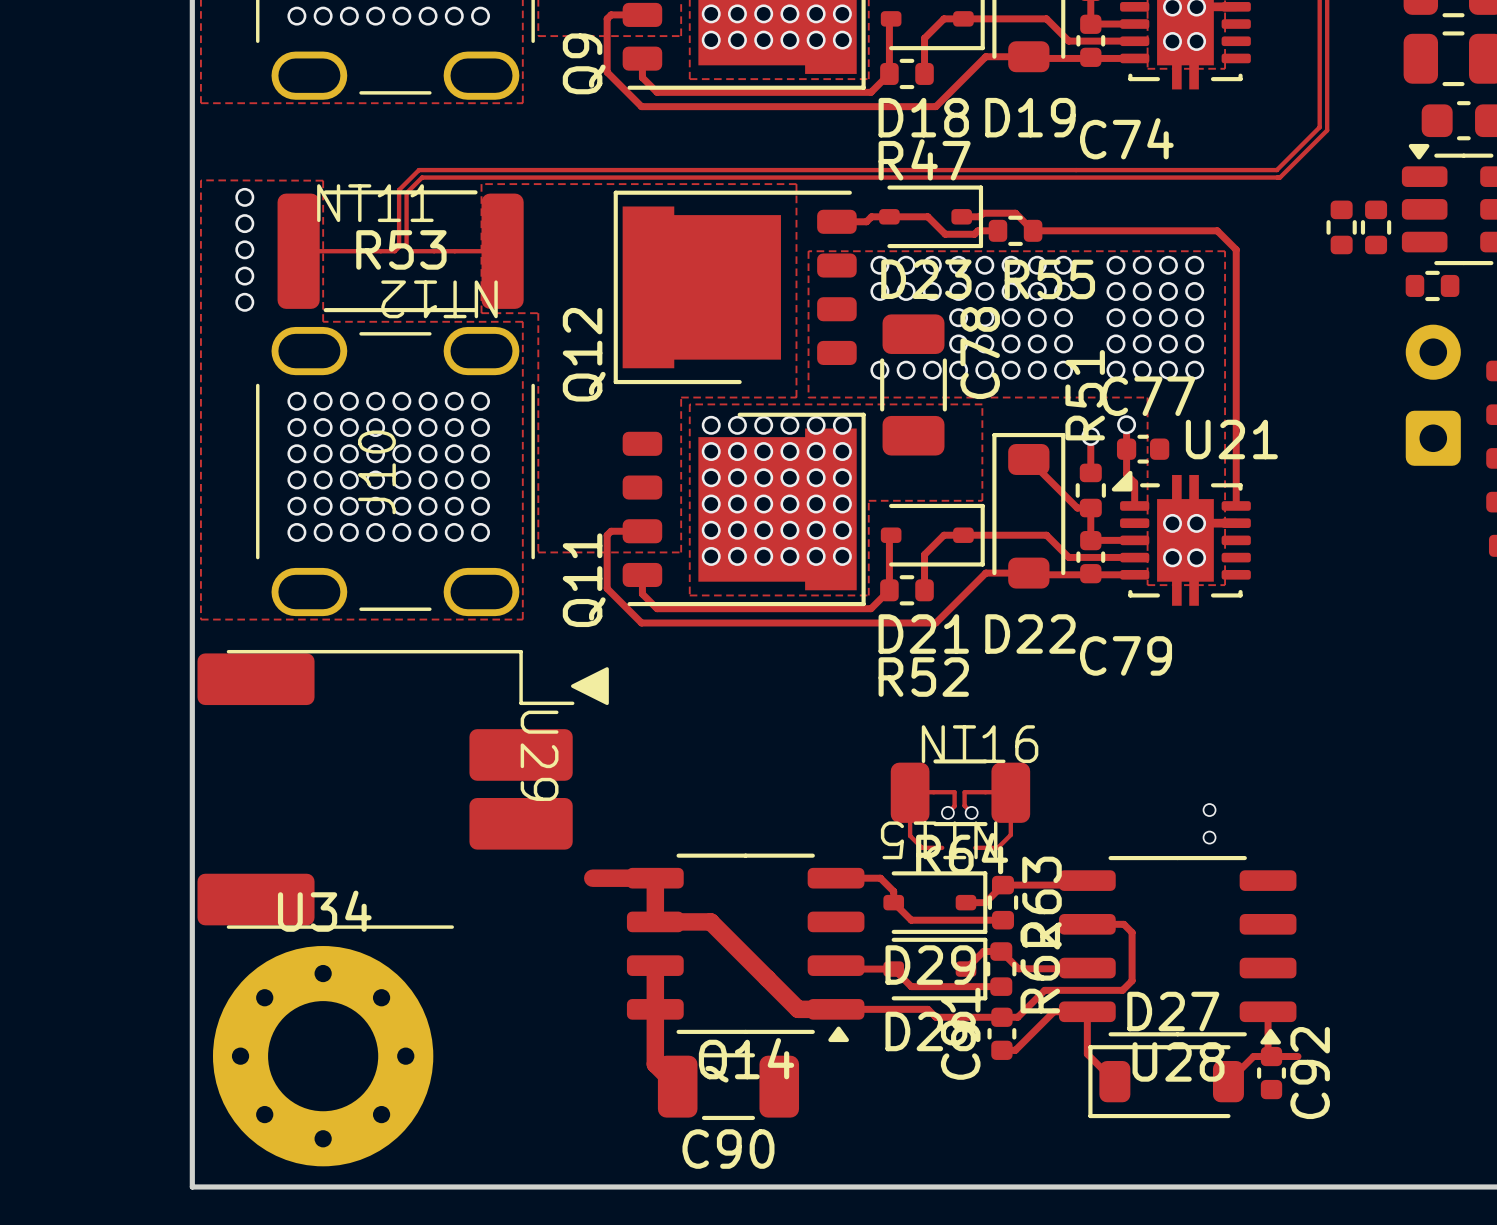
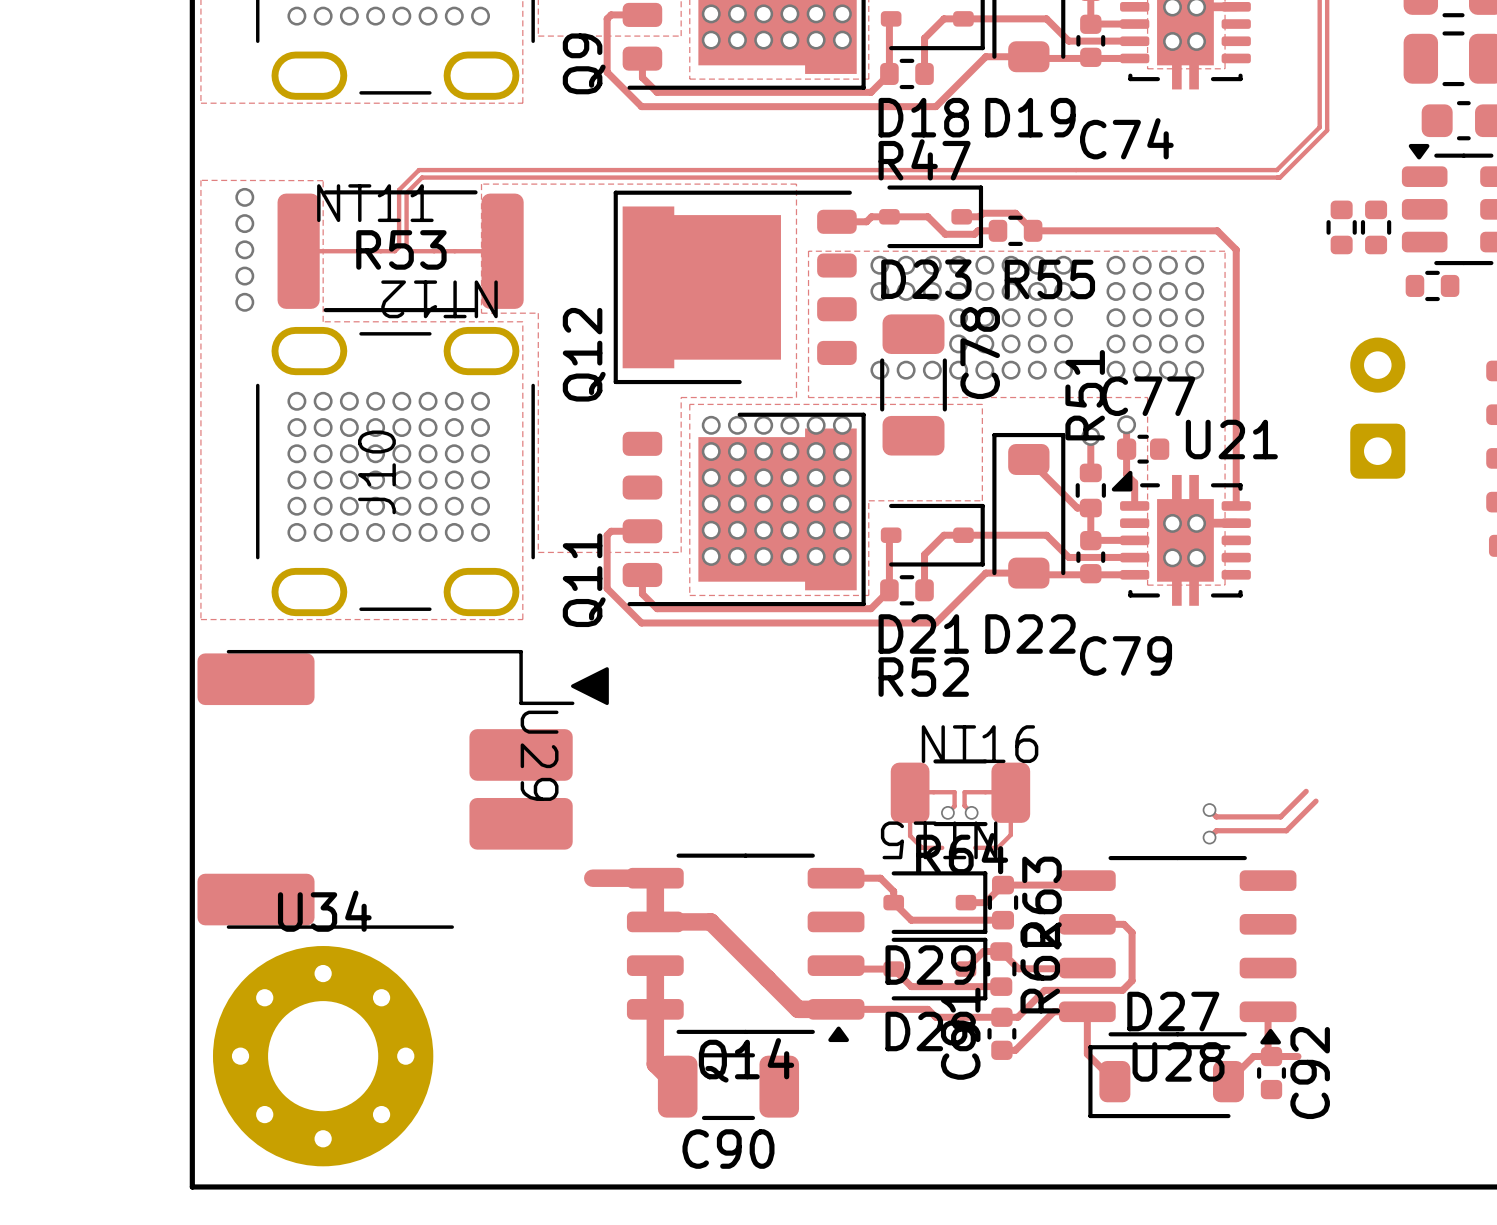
part position: (1433, 395) -> (1377, 408)
track: none -> (1306, 791) (1280, 816) (1216, 816) (1209, 810)
track: none -> (1315, 801) (1286, 830) (1216, 830) (1209, 837)

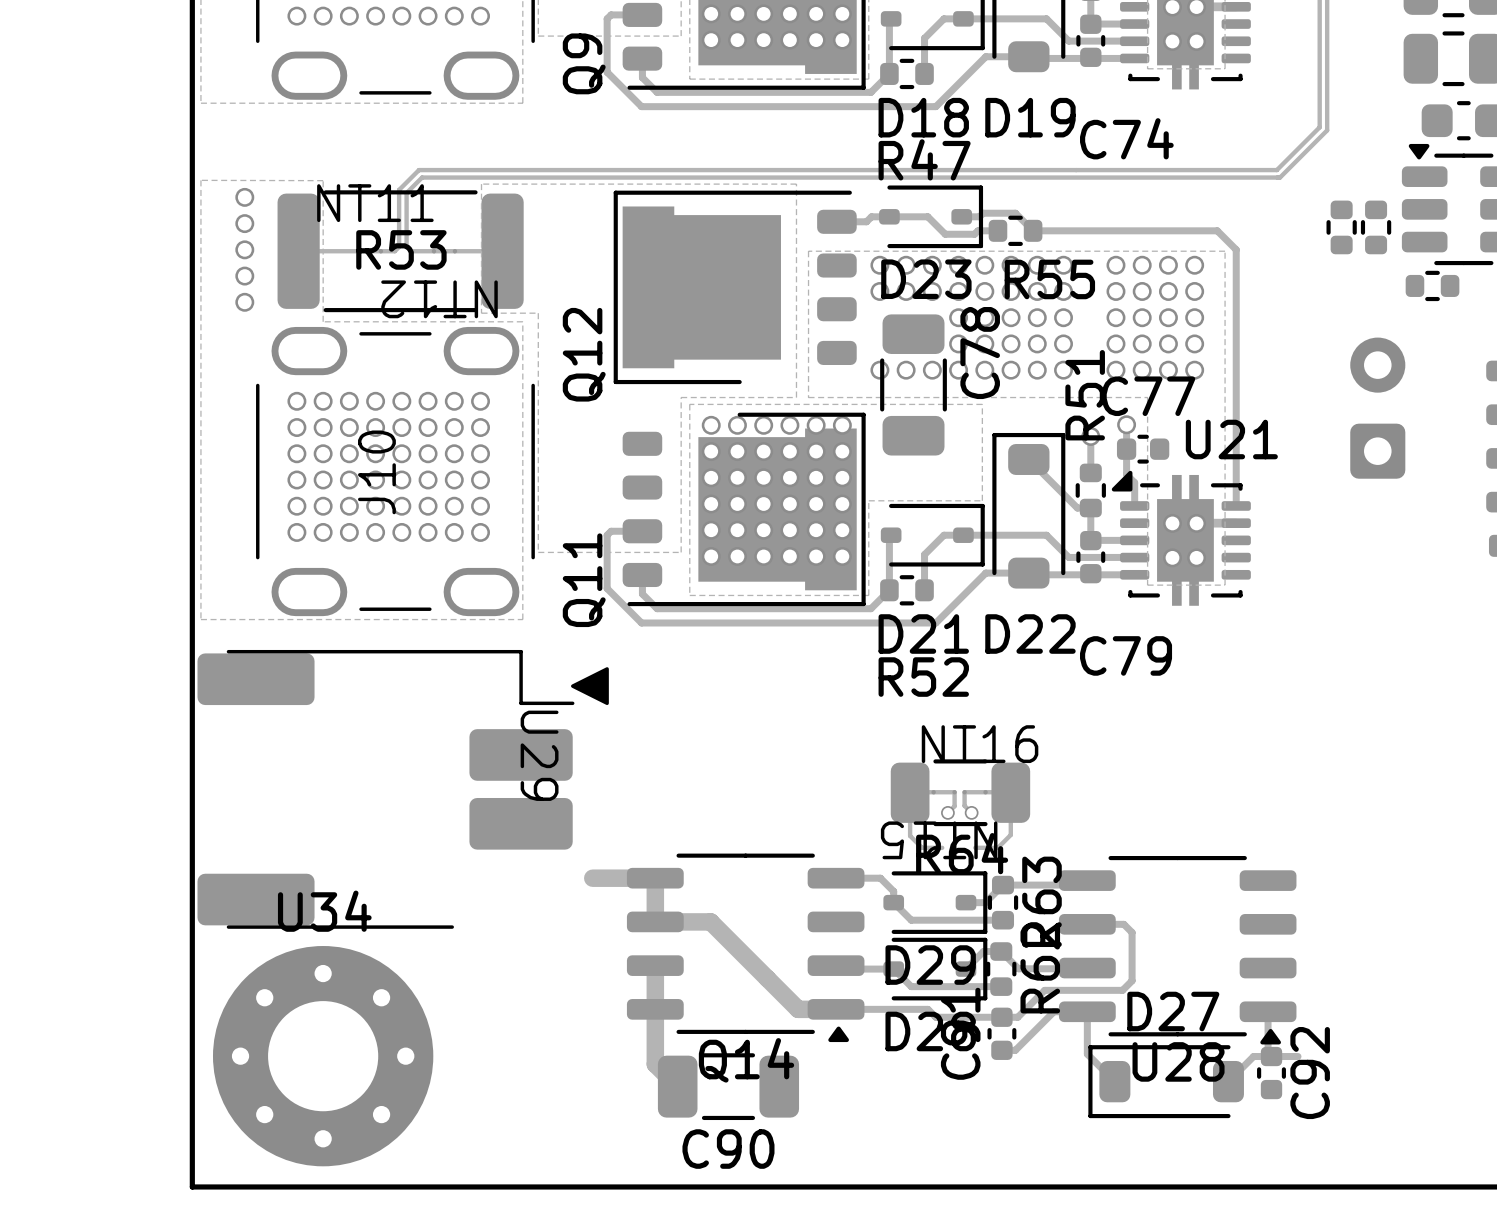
track: (1306, 791) (1280, 816) (1216, 816) (1209, 810) -> none
track: (1315, 801) (1286, 830) (1216, 830) (1209, 837) -> none
via: (1209, 810) -> none
via: (1209, 837) -> none

